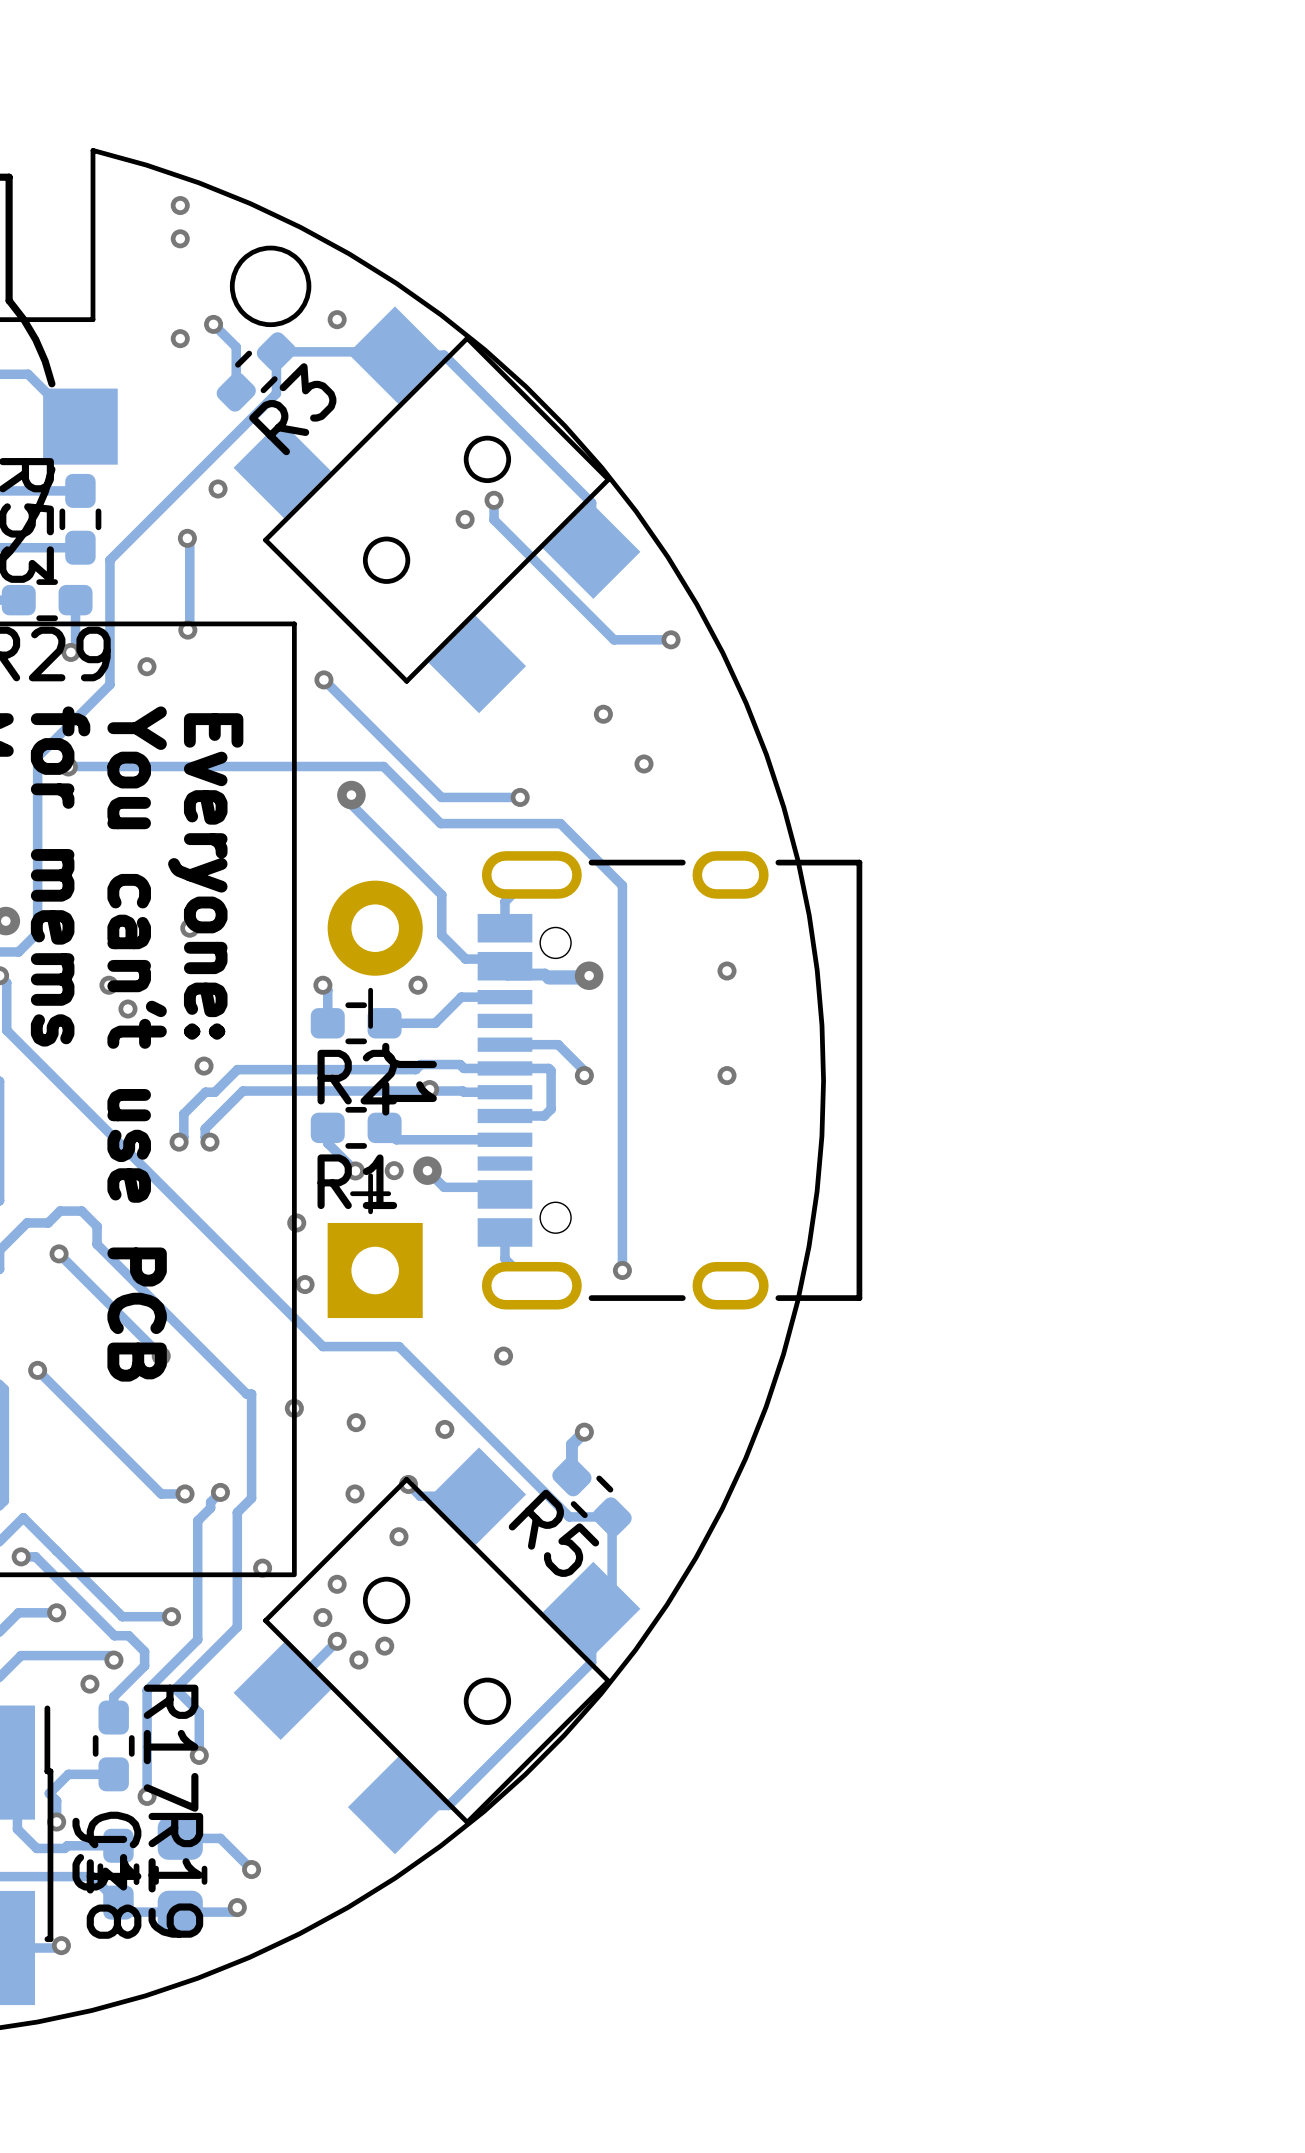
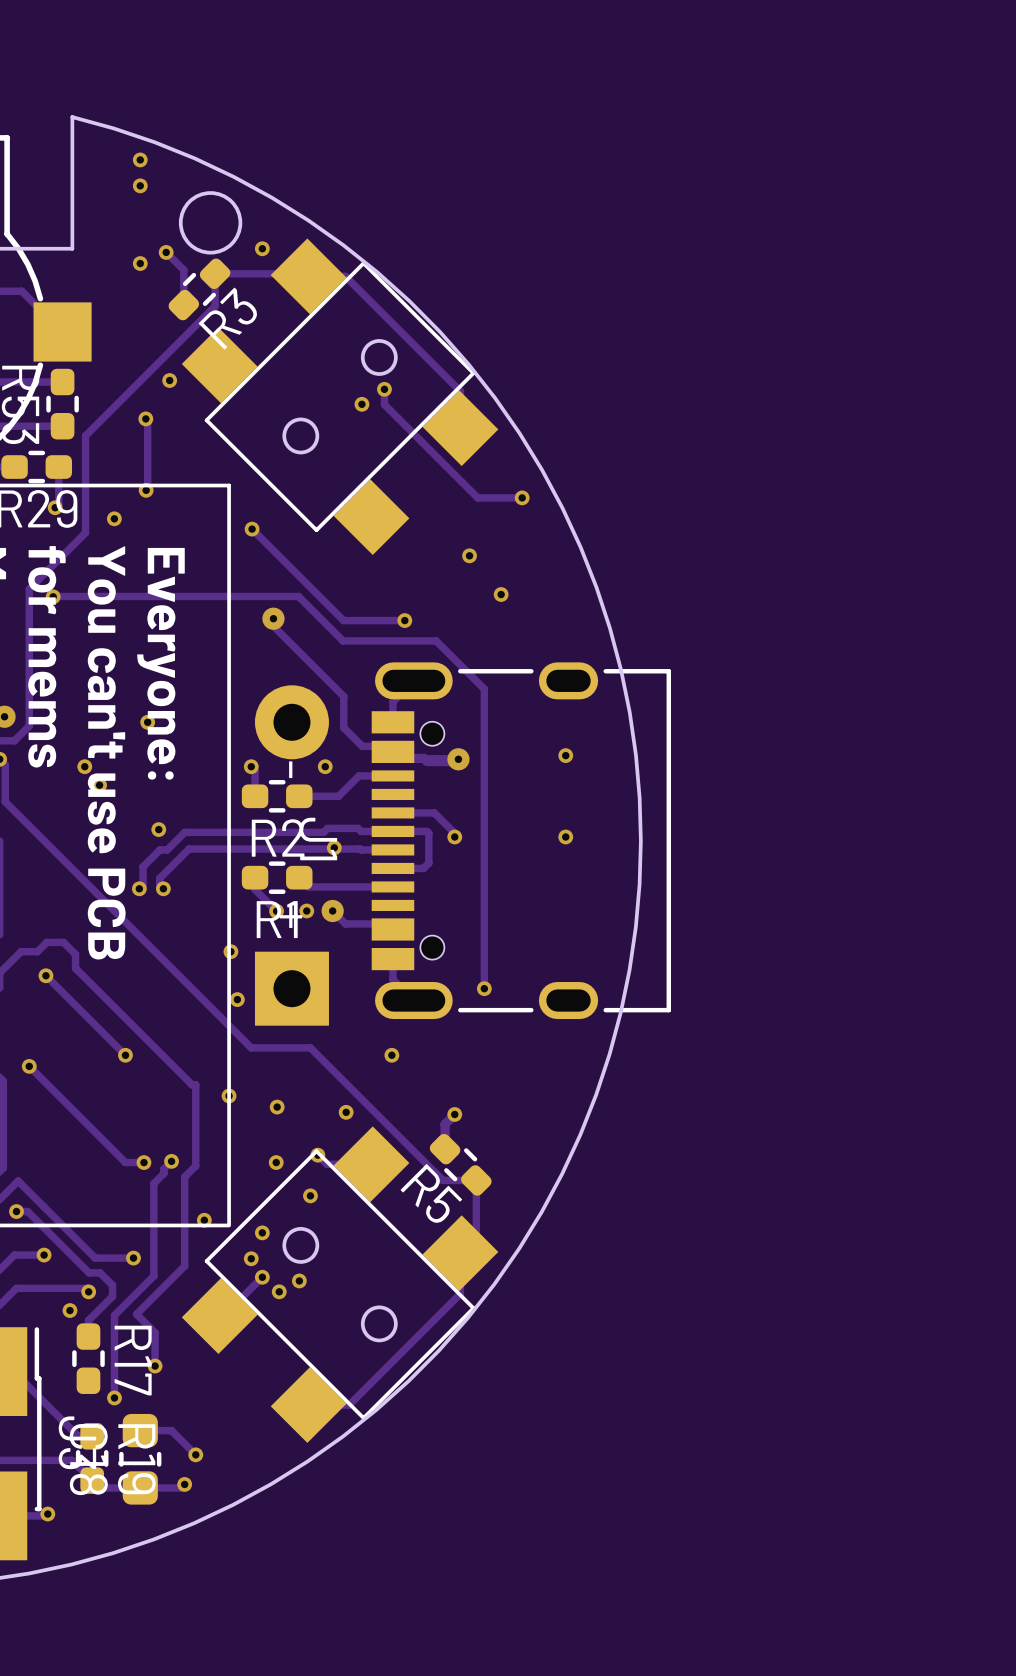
track: (17, 1762) (17, 1829) (36, 1848) (100, 1845) -> (13, 1371) (78, 1436)
track: (113, 1774) (68, 1774) (49, 1793) (56, 1800) (56, 1822) -> none
via: (56, 1822) -> none

